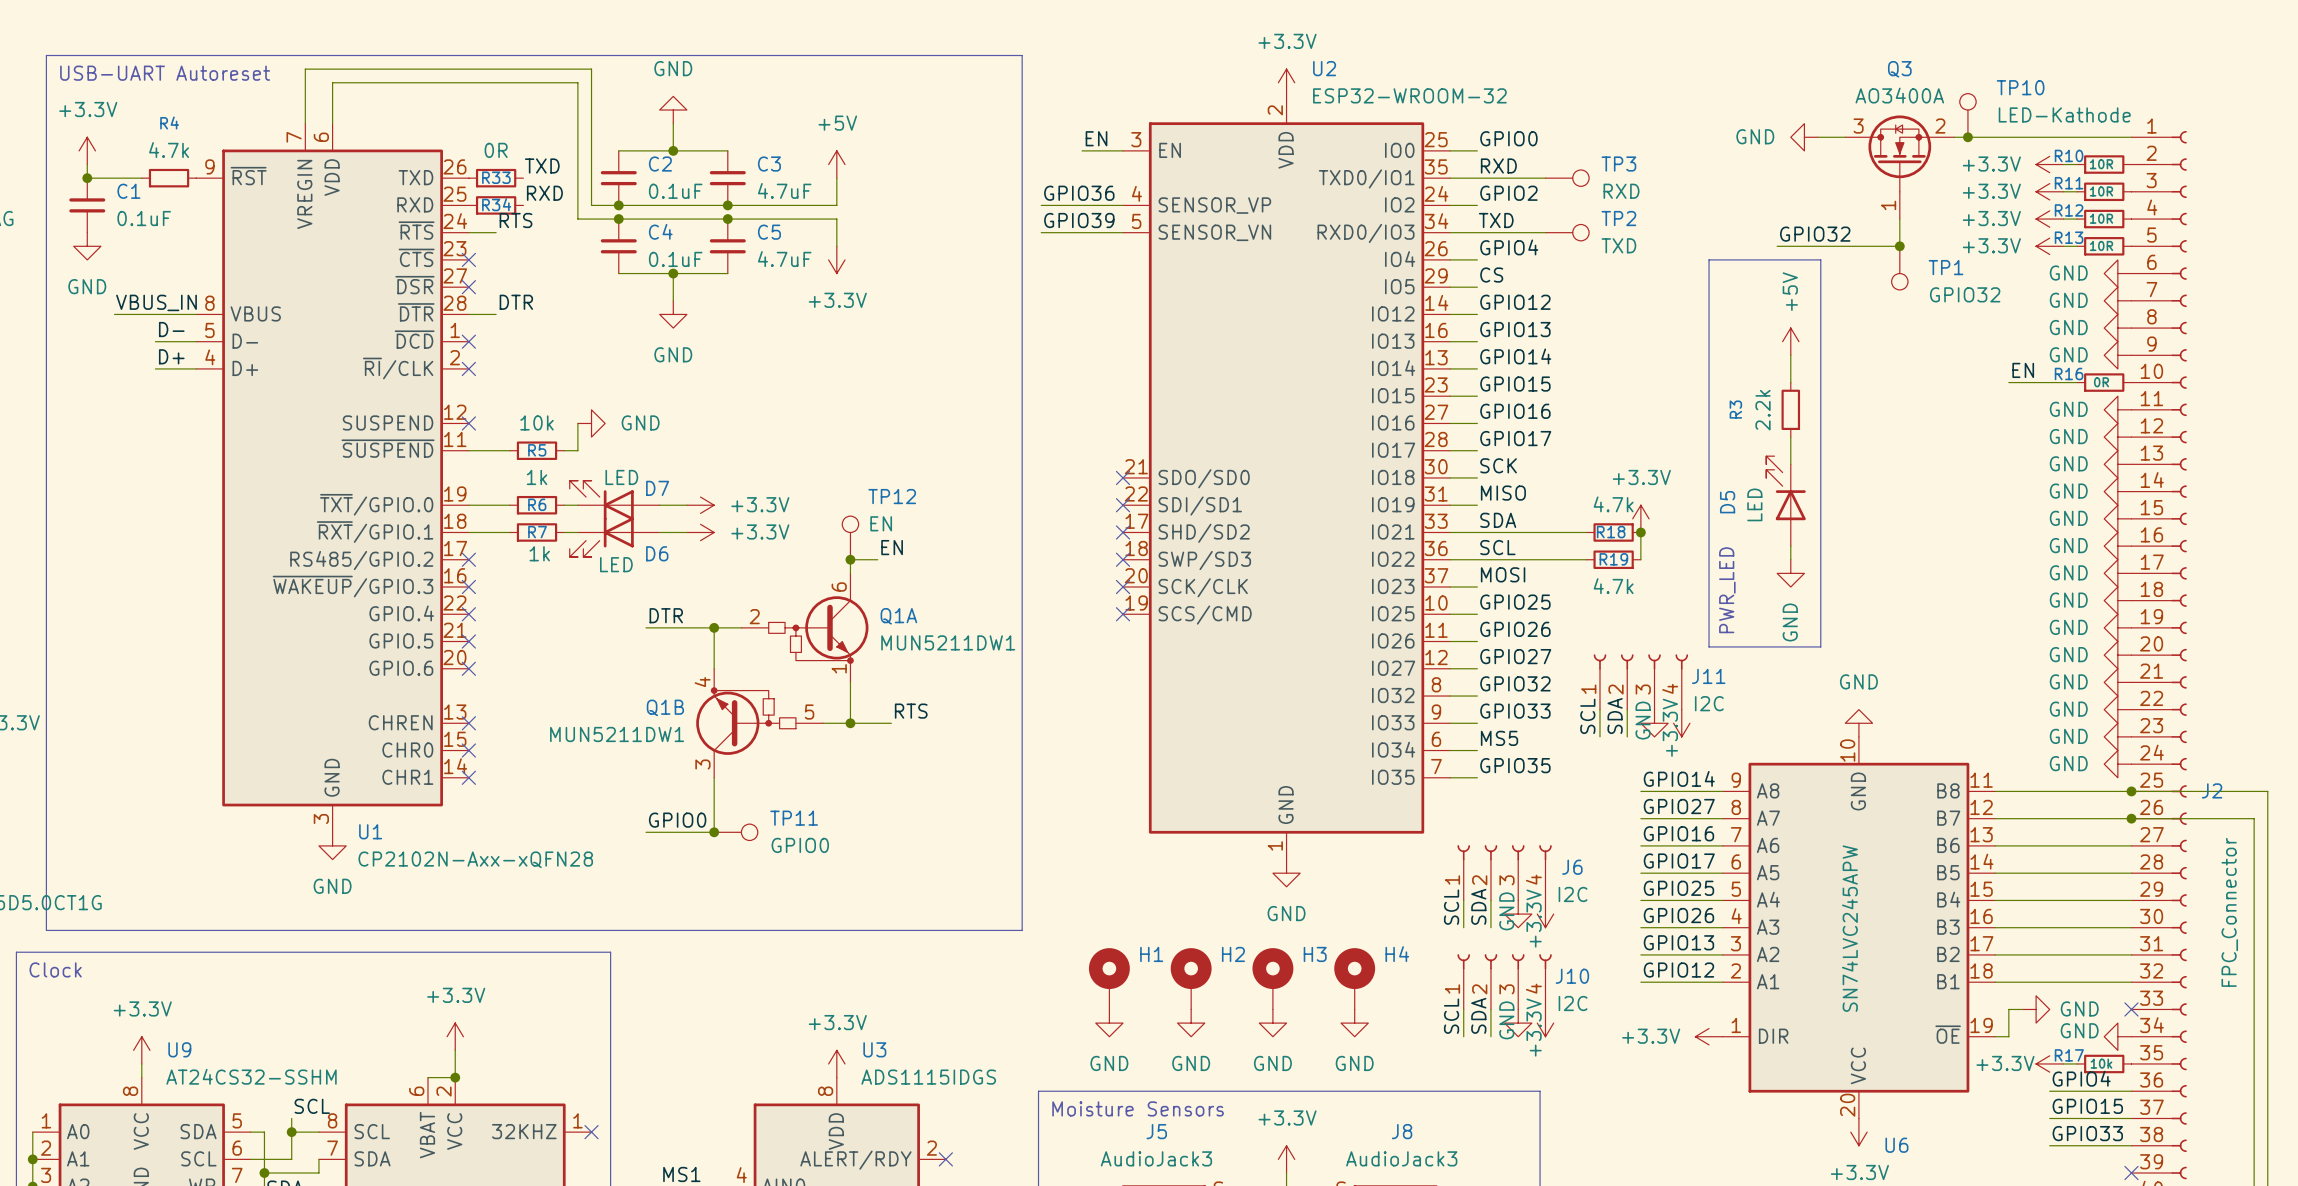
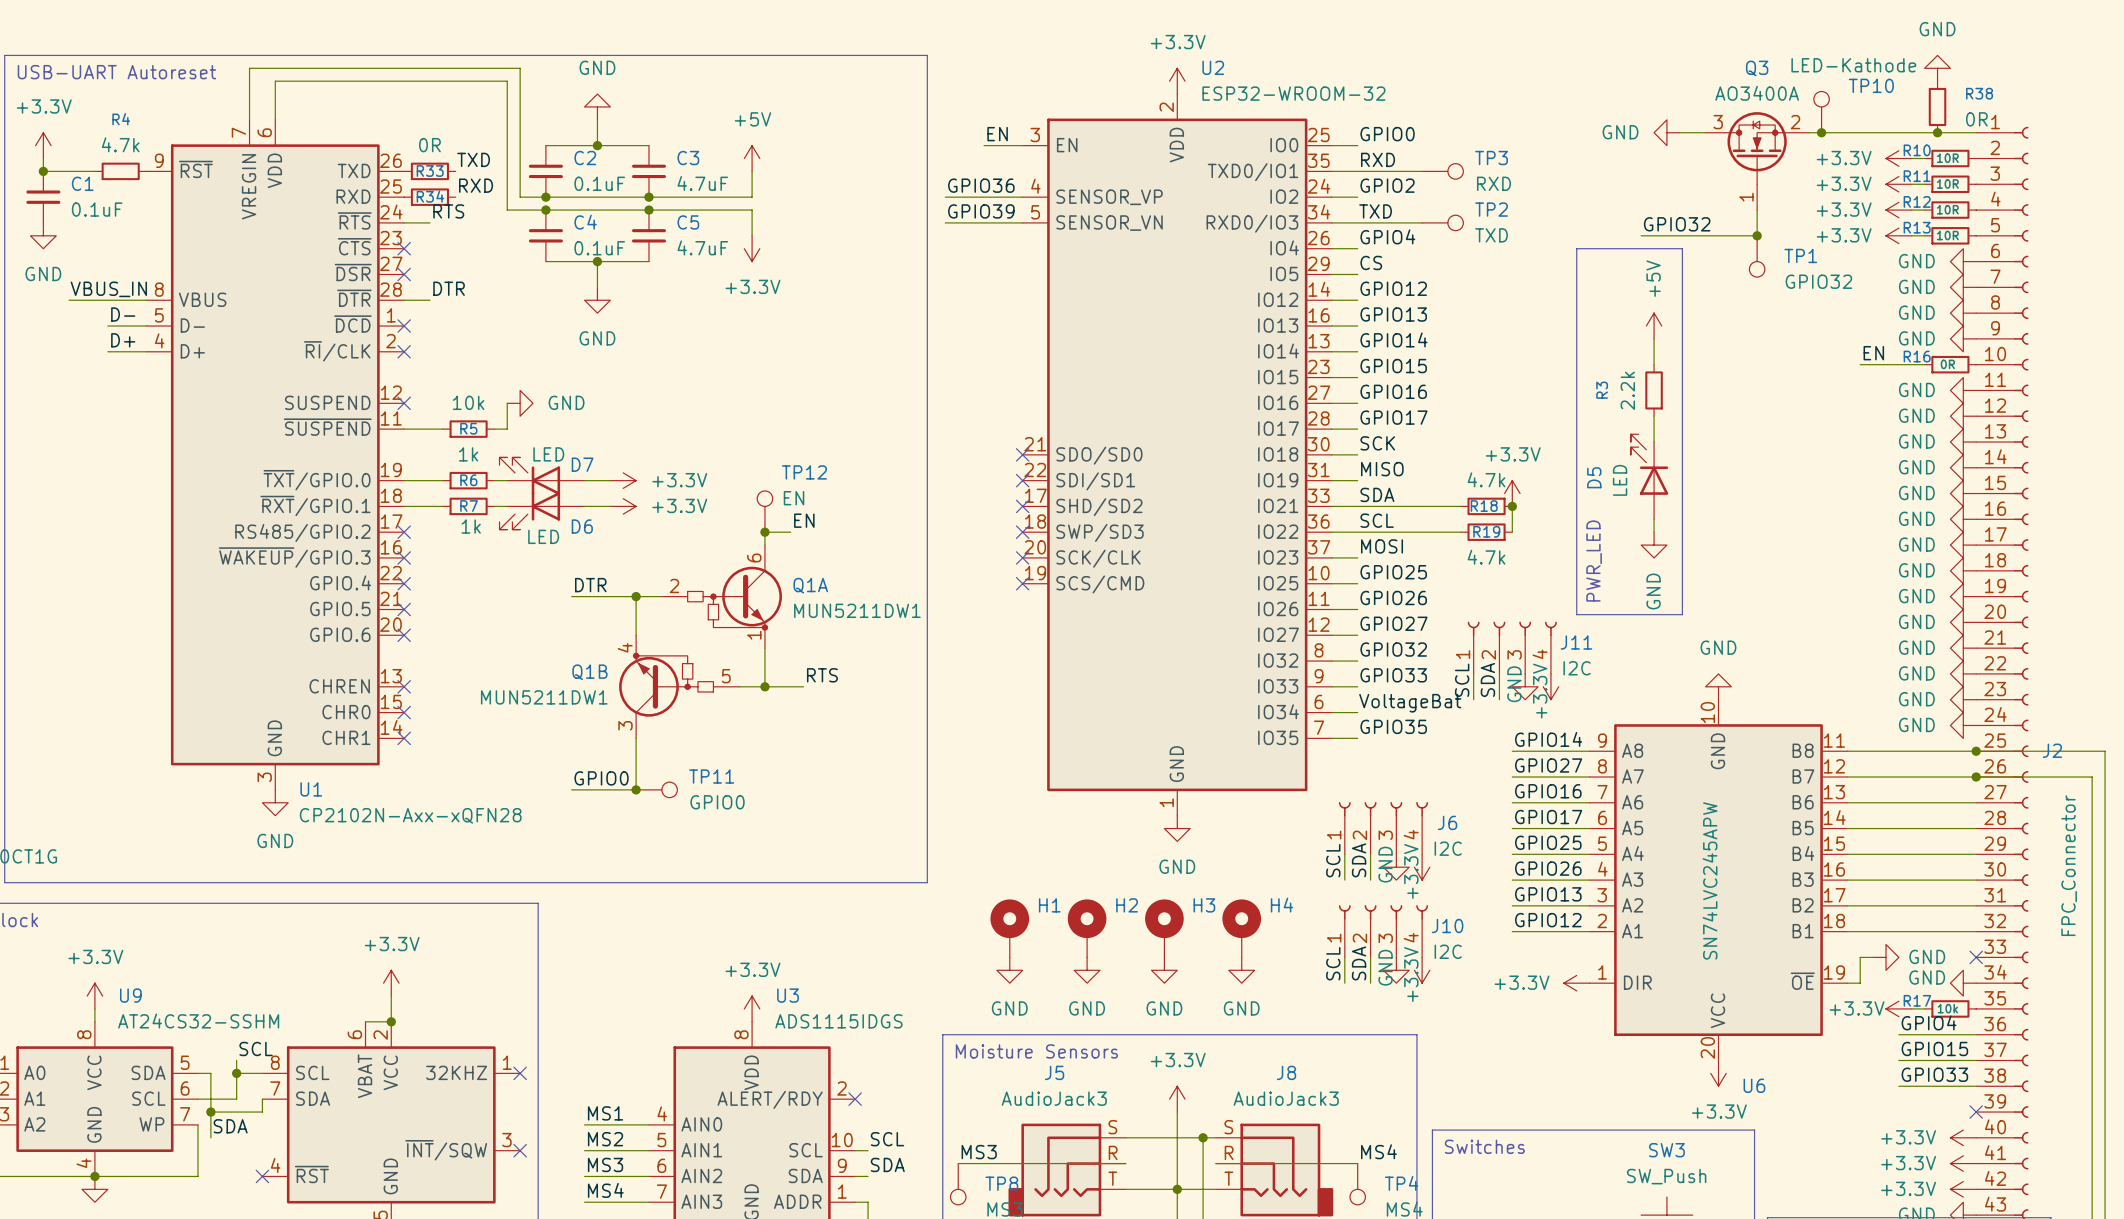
power symbol: none -> GND (1937, 68)
R38: none -> 0R (1937, 106)
TP10 value position: LED-Kathode (2064, 114) -> LED-Kathode (1853, 65)
junction: none -> (1937, 132)
label: MS5 (1499, 738) -> VoltageBat (1410, 703)

